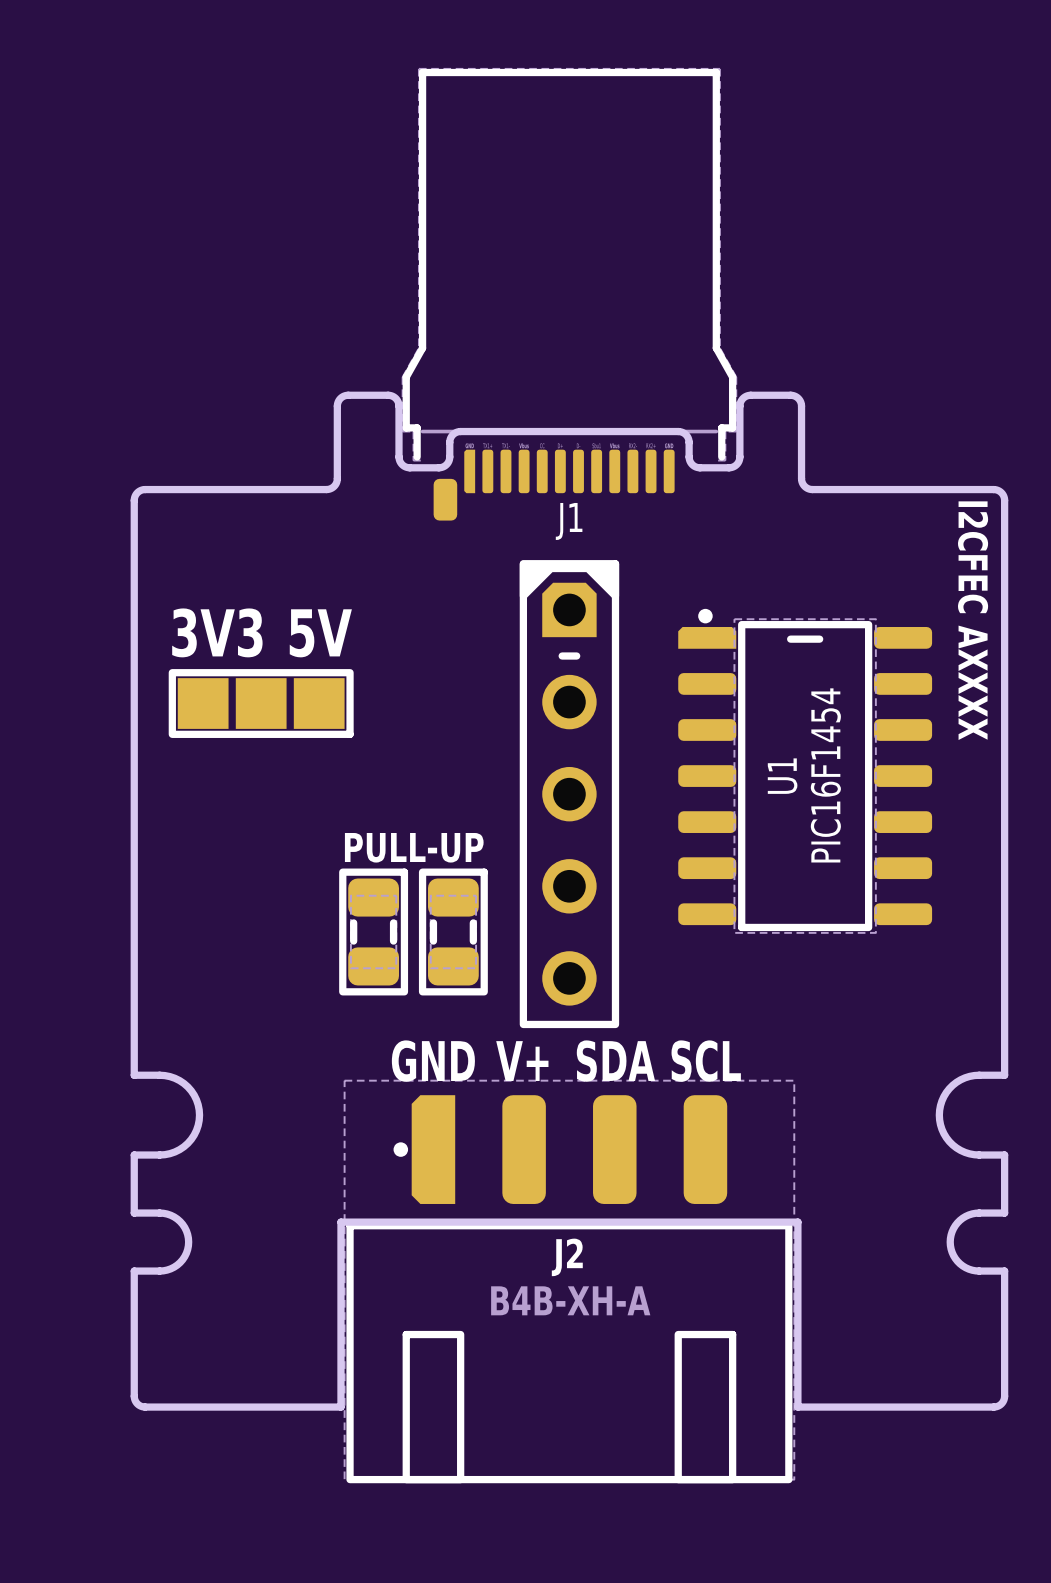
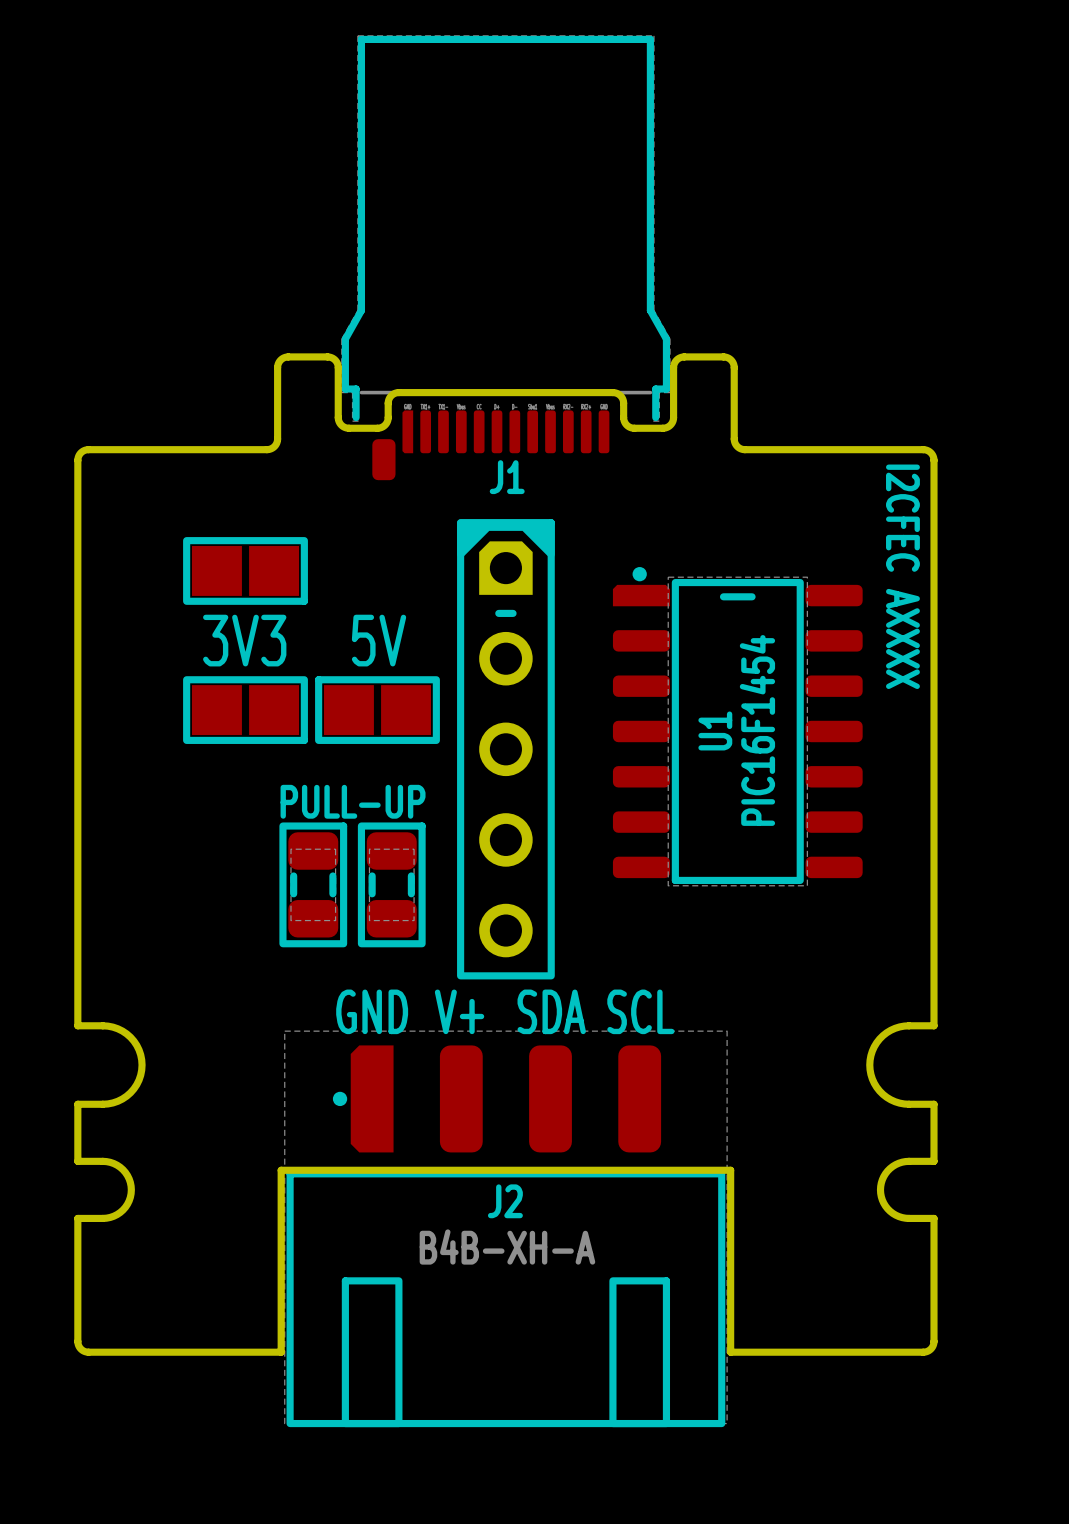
part: none -> (245, 570)
text position: 3V3 (217, 632) -> 3V3 (244, 640)
text position: 5V (320, 633) -> 5V (379, 640)
part: (261, 703) -> none
part: none -> (245, 710)
part: none -> (377, 710)

